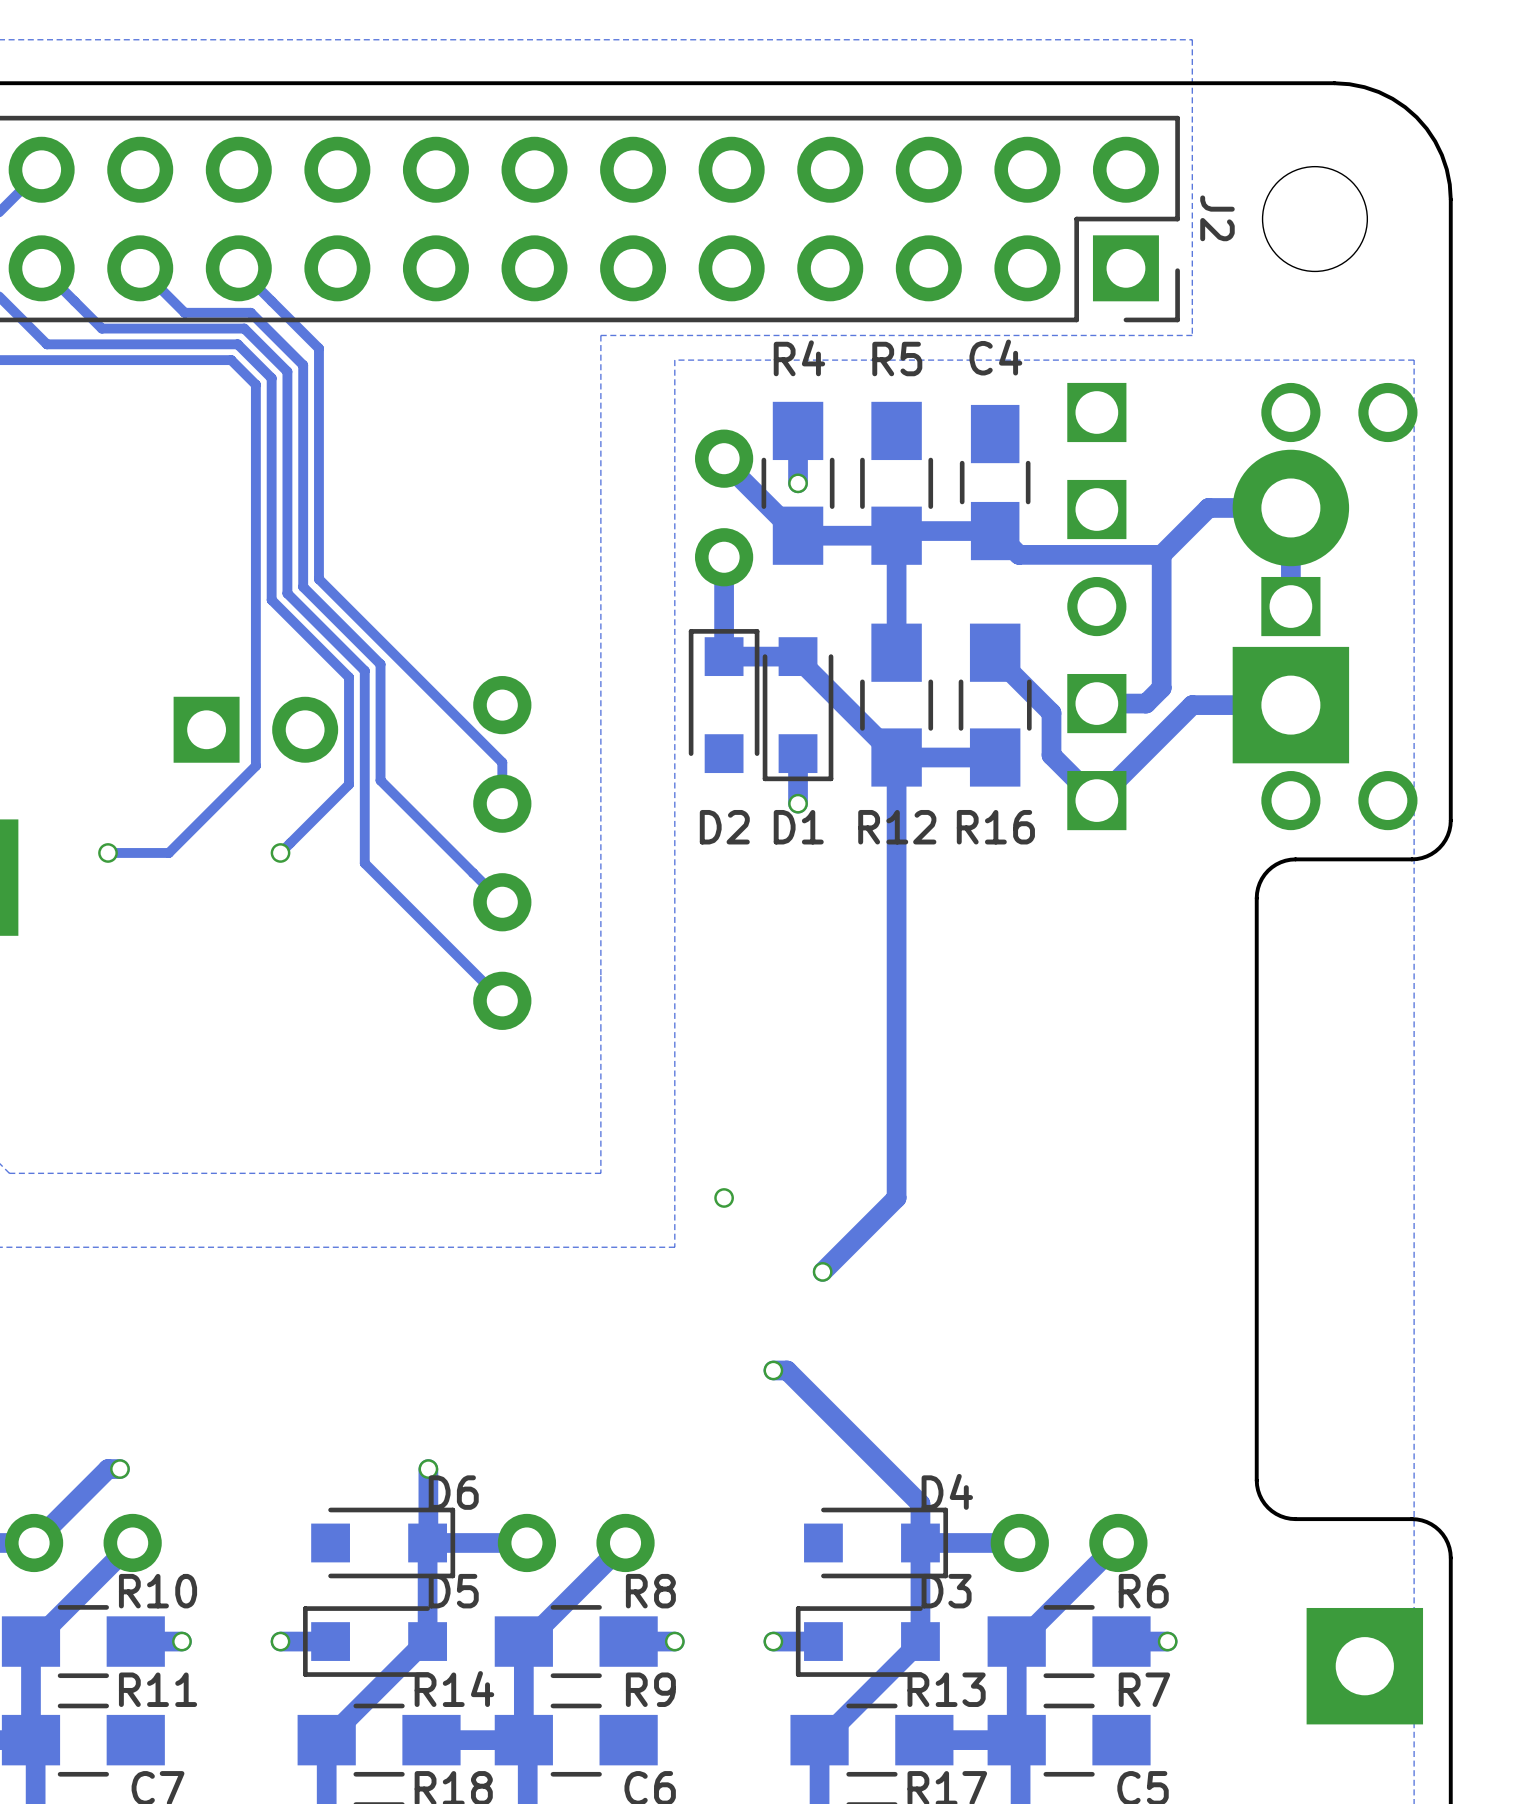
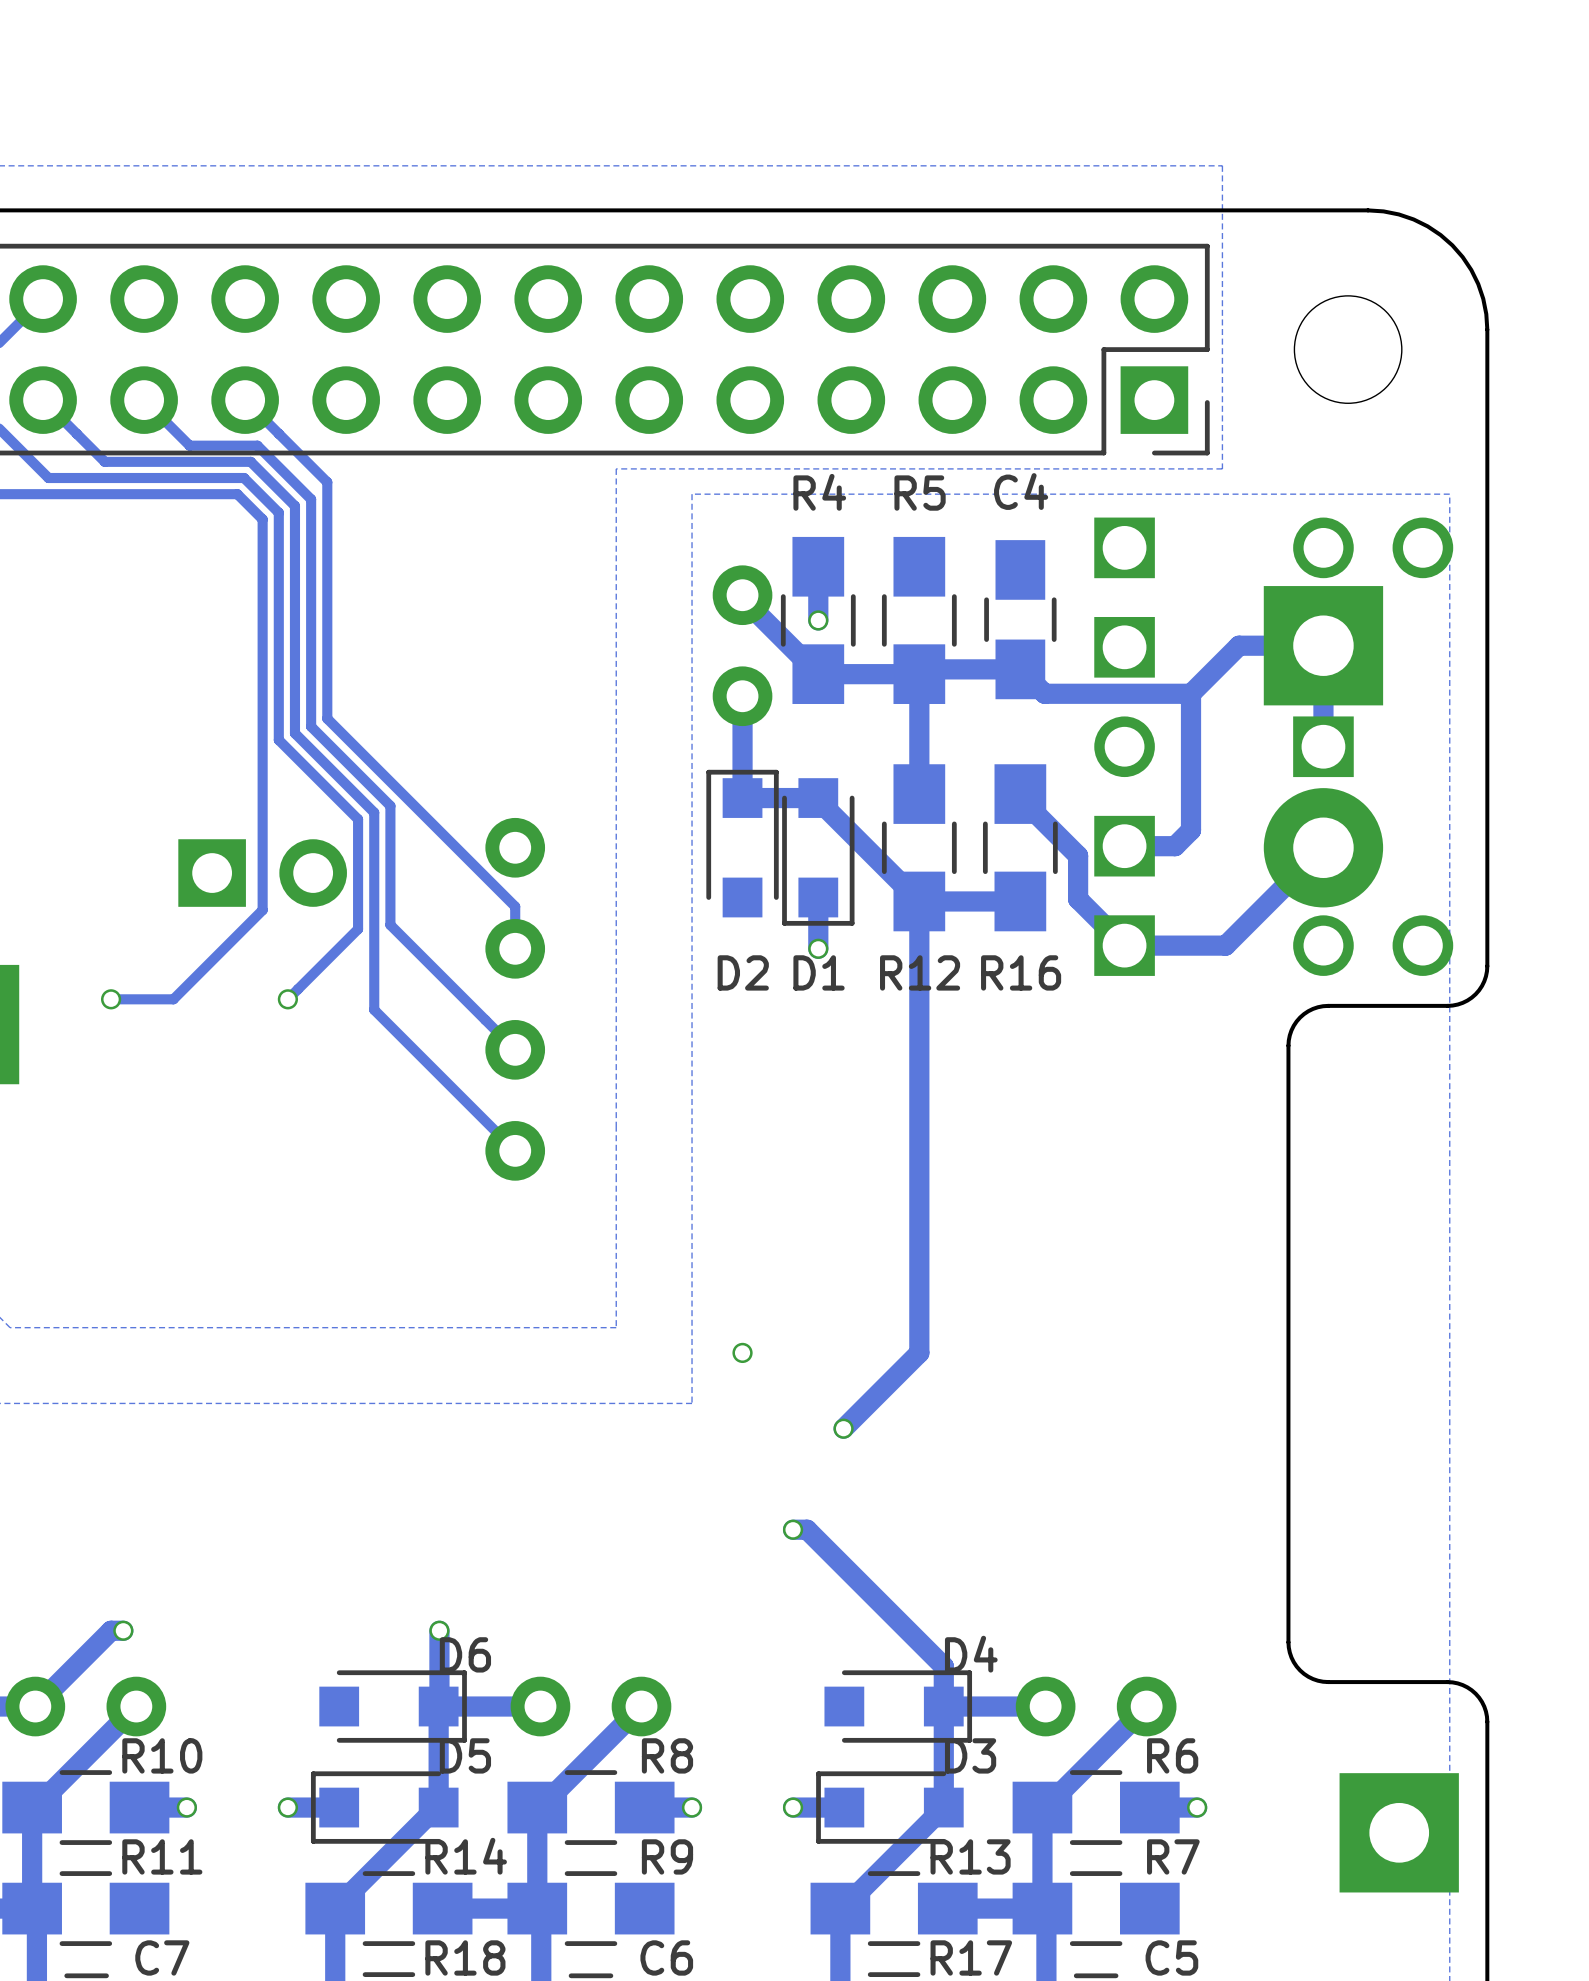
J2 name: J2 (1217, 218) -> none
part rotation: 0° (1290, 606) -> 180° (1323, 746)
track: (1290, 705) (1192, 705) (1096, 800) -> (1323, 847) (1225, 945) (1124, 945)

